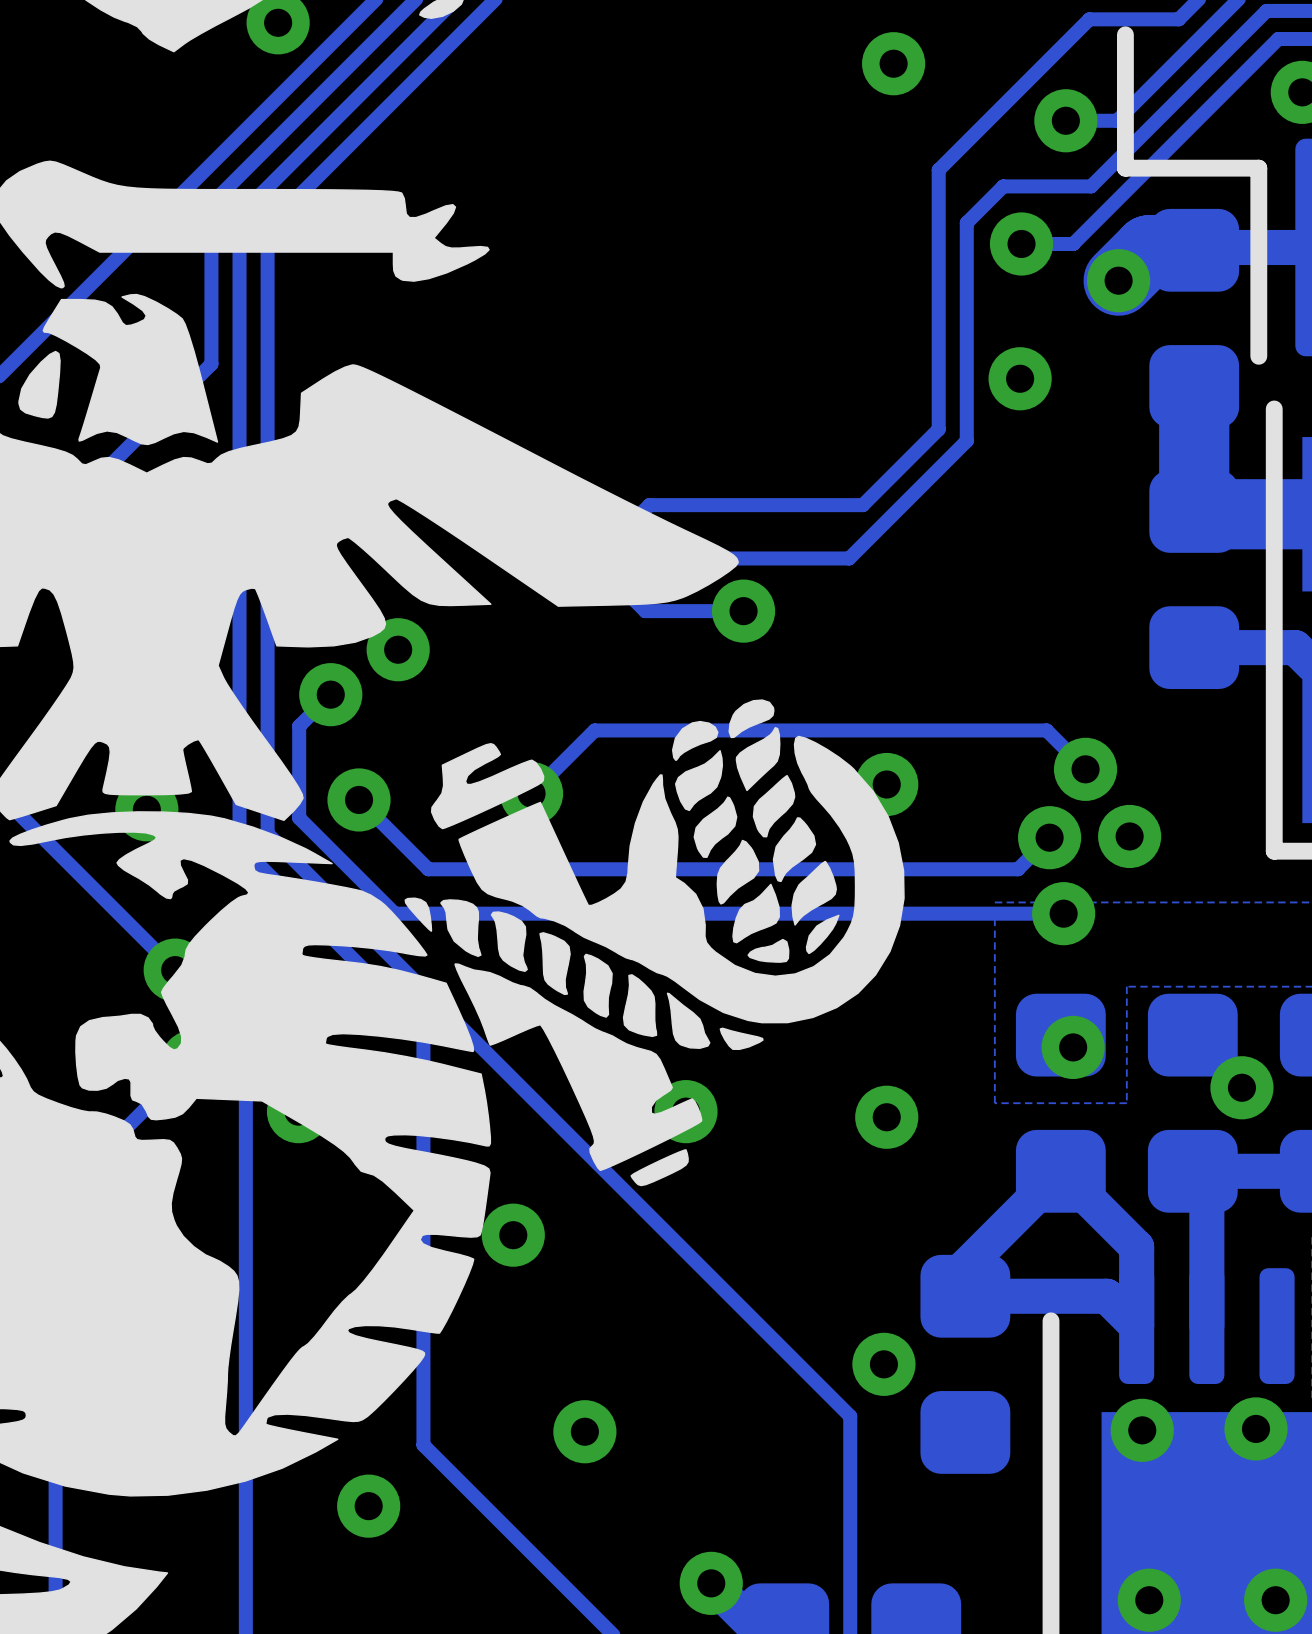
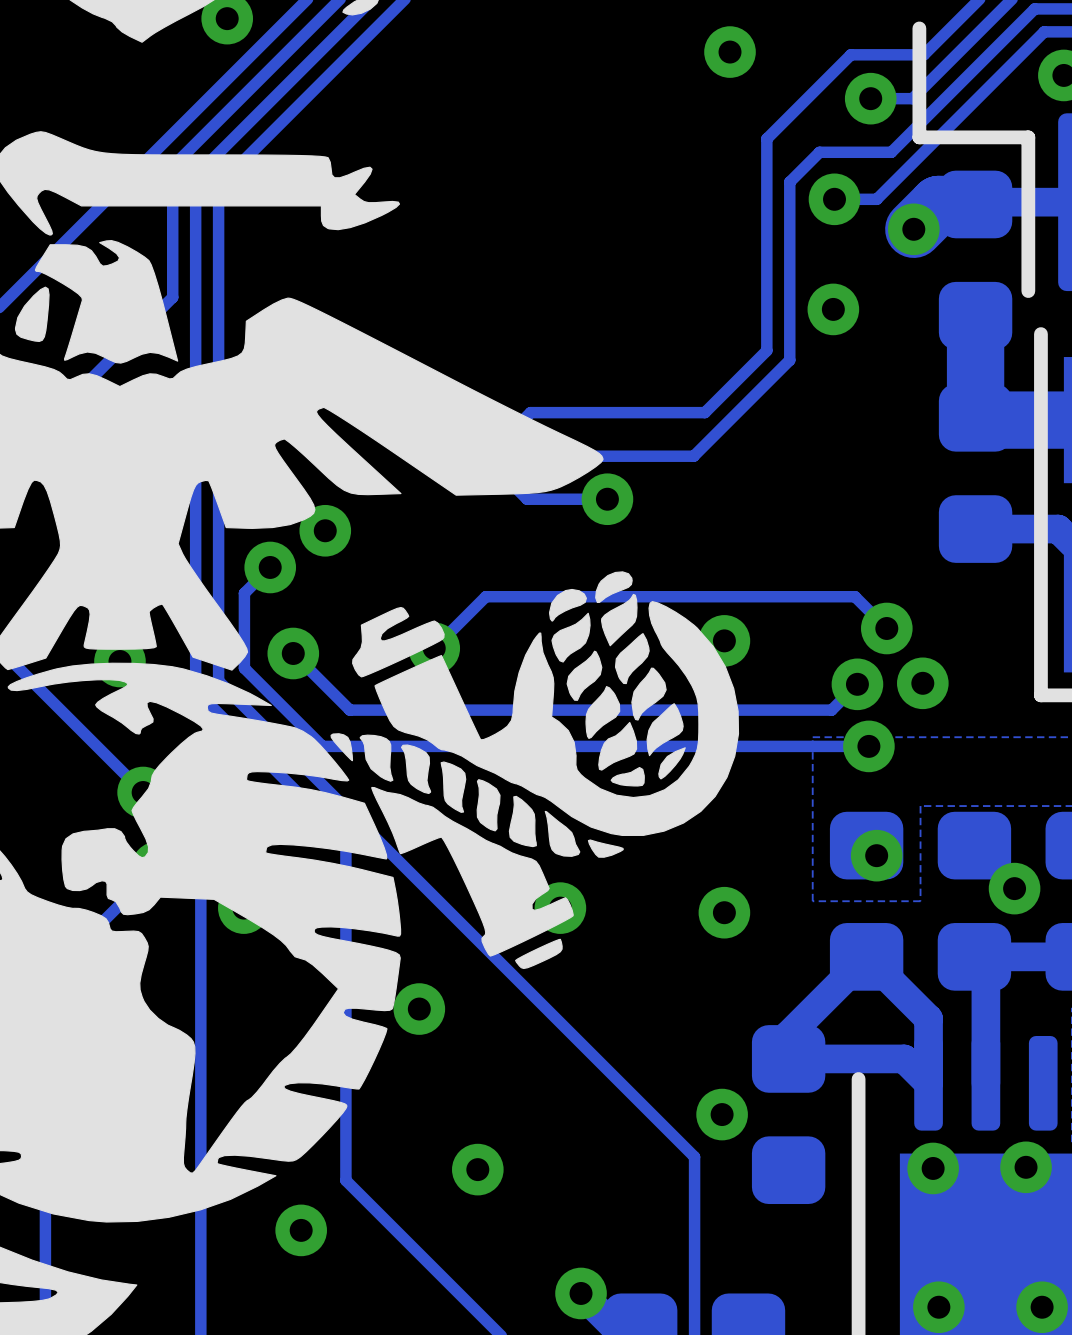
track: (1178, 19) (1089, 19) (1041, 67) -> (962, 15) (923, 54) (850, 54)

